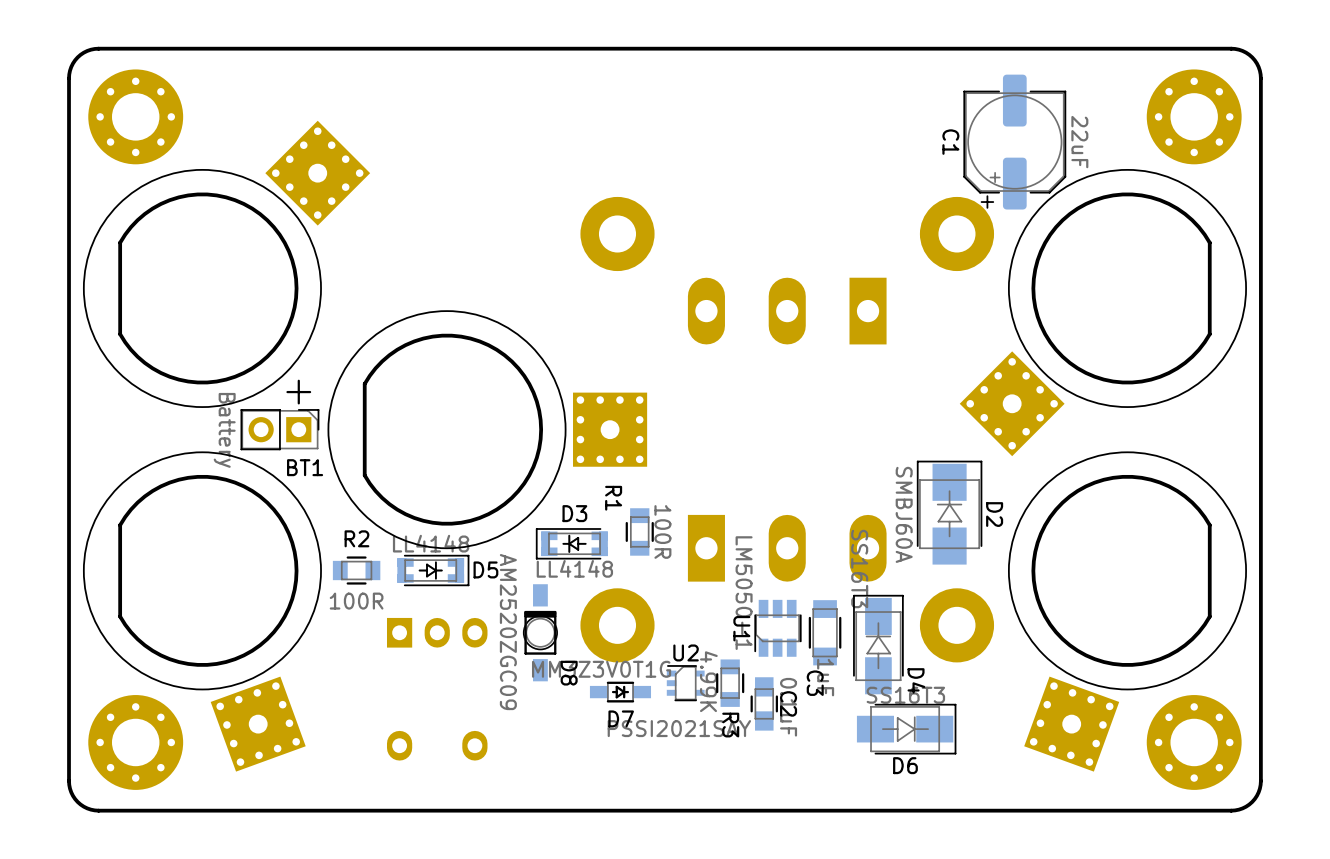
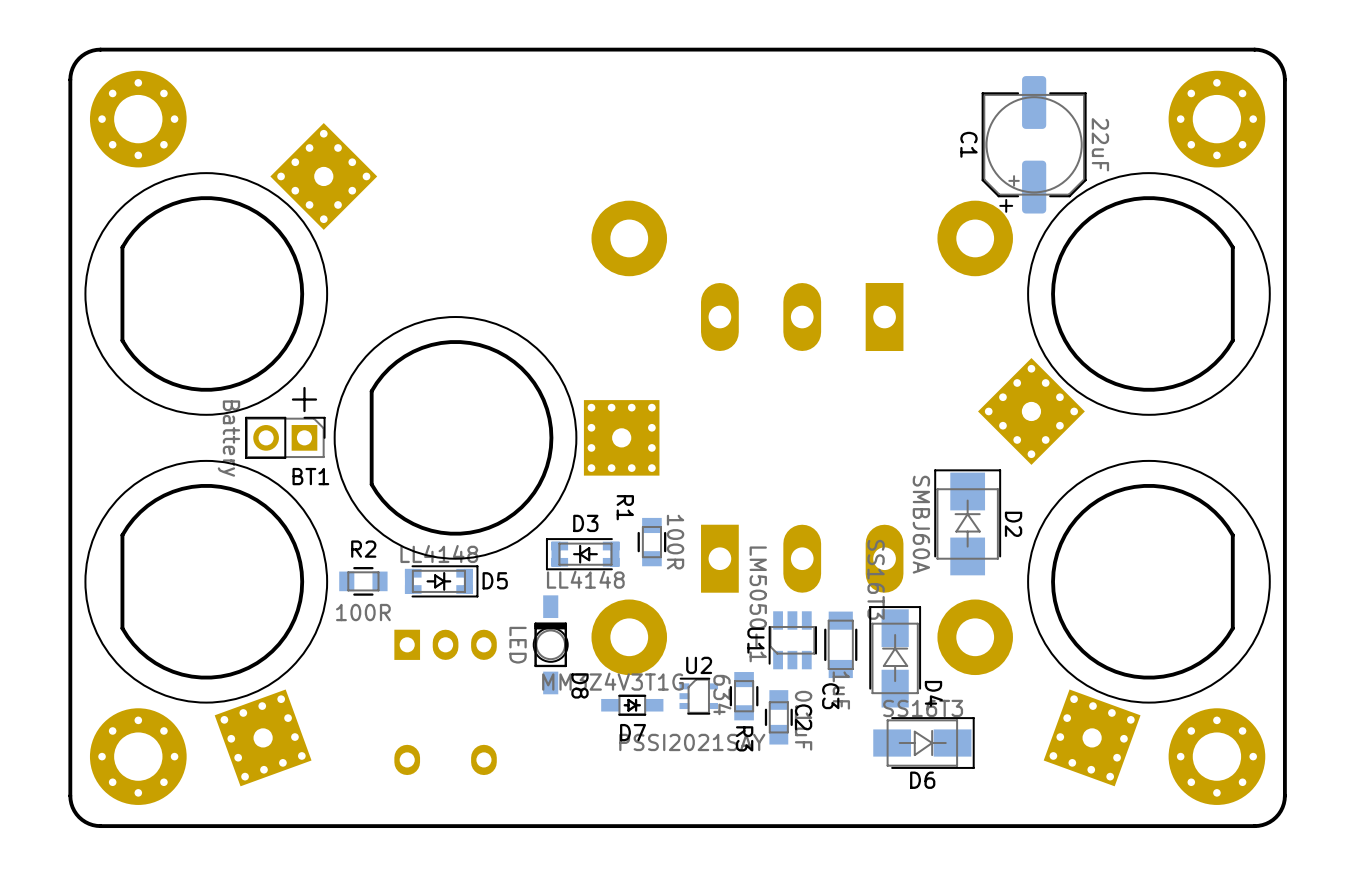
D8 value: AM2520ZGC09 (508, 632) -> LED (518, 645)
D7 value: MM3Z3V0T1G (601, 669) -> MM3Z4V3T1G (613, 681)
R3 value: 4.99K (708, 681) -> 634 (722, 695)

